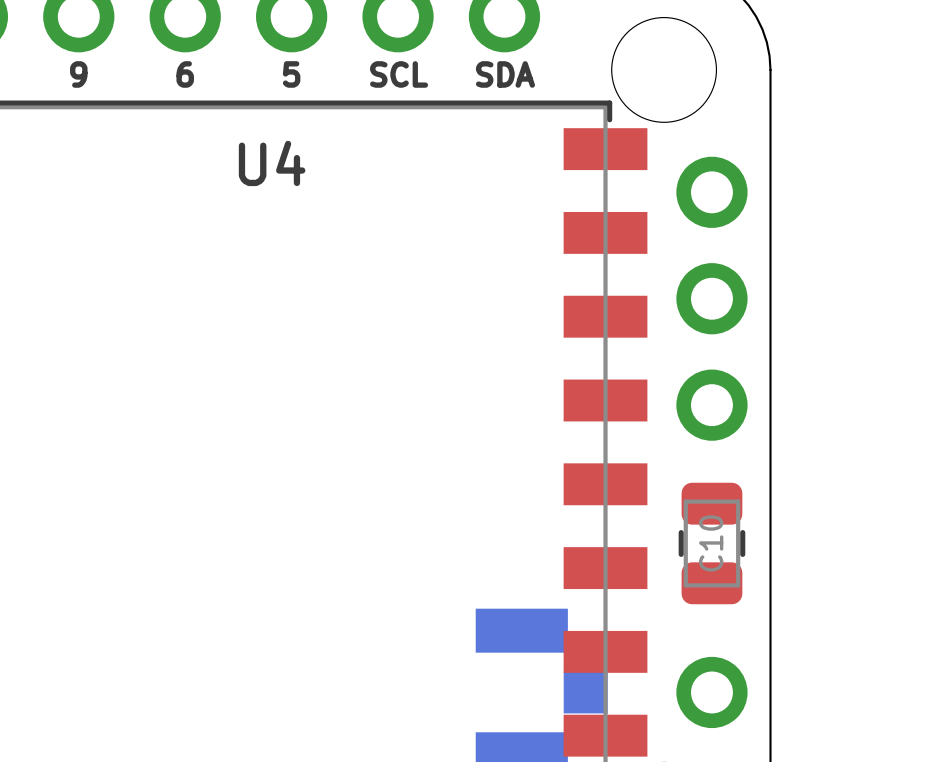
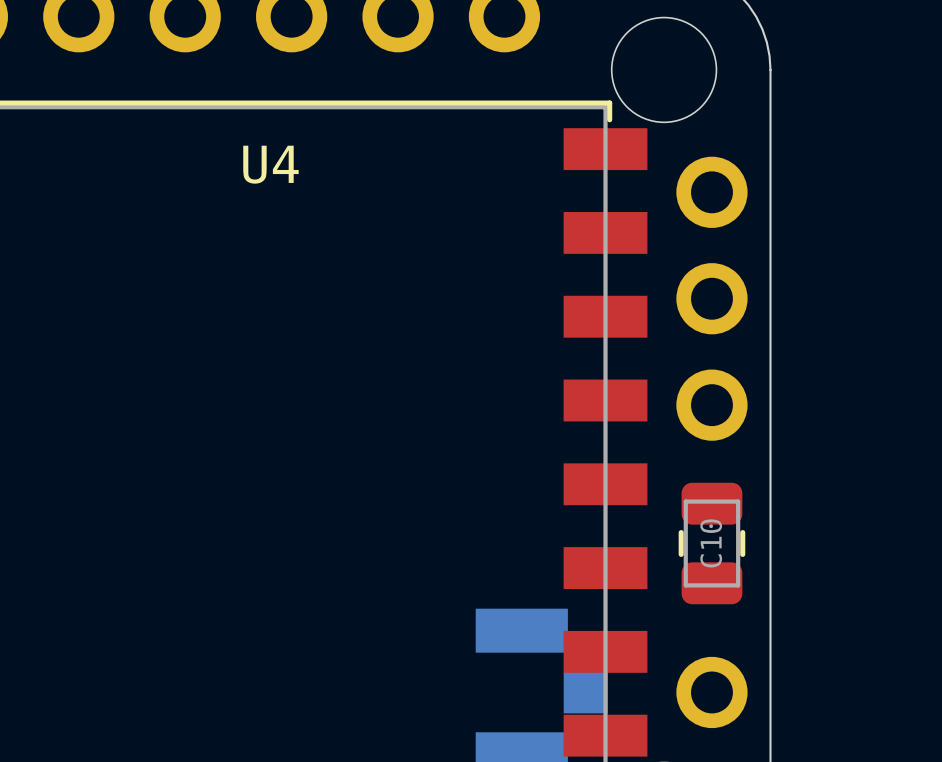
text: 9 (78, 74) -> none
text: 6 (185, 74) -> none
text: 5 (291, 74) -> none
text: SCL (399, 74) -> none
text: SDA (505, 74) -> none

